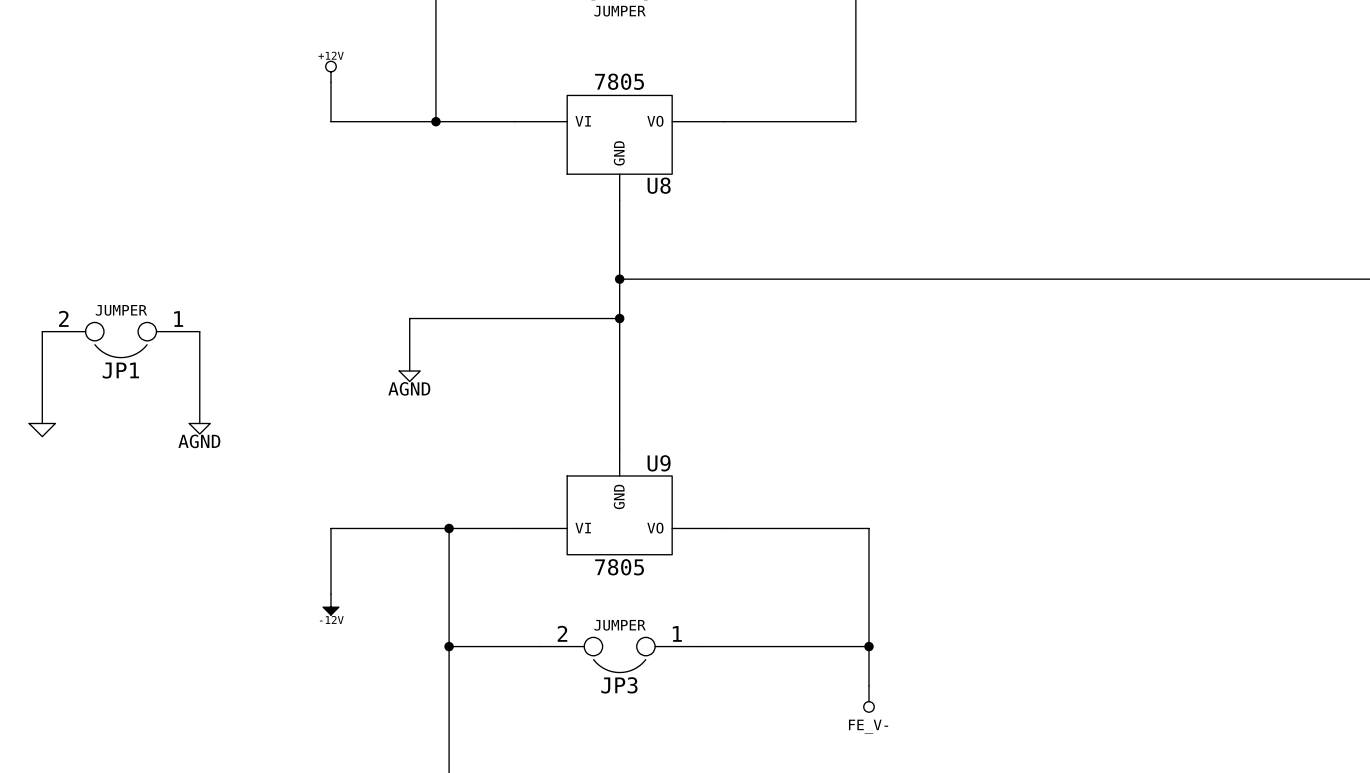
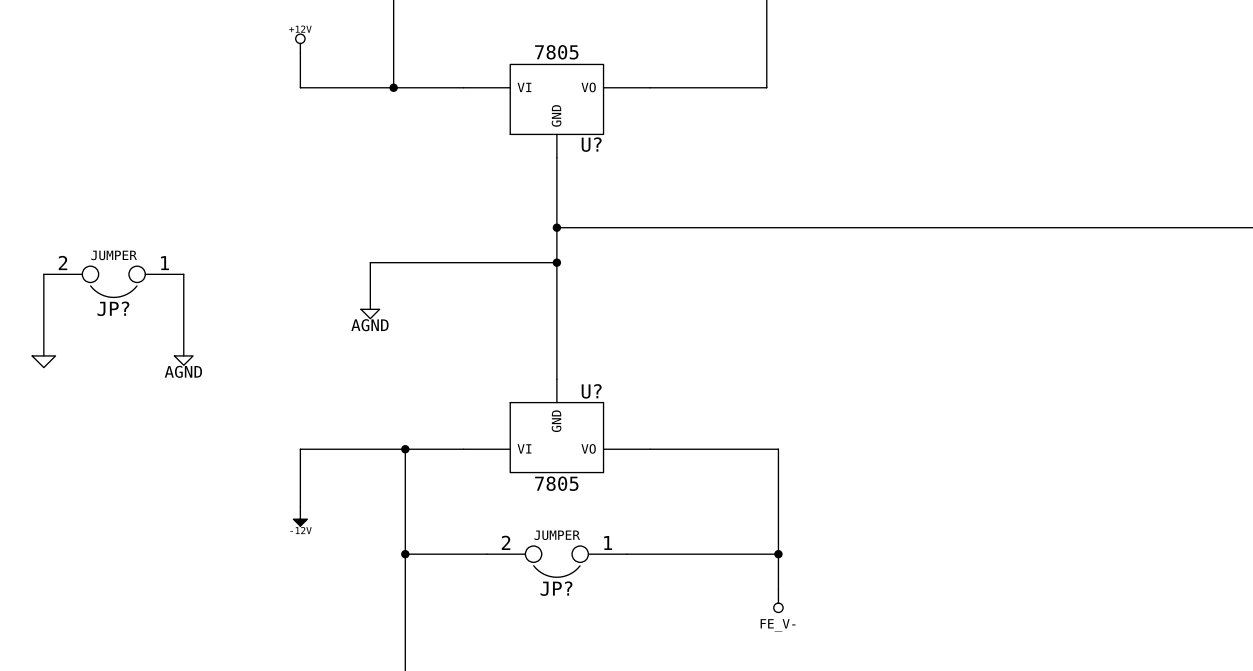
U8 name: U8 (659, 185) -> U? (591, 144)
JP1 name: JP1 (120, 370) -> JP? (113, 308)
U9 name: U9 (659, 463) -> U? (591, 391)
JP3 name: JP3 (619, 685) -> JP? (556, 588)

